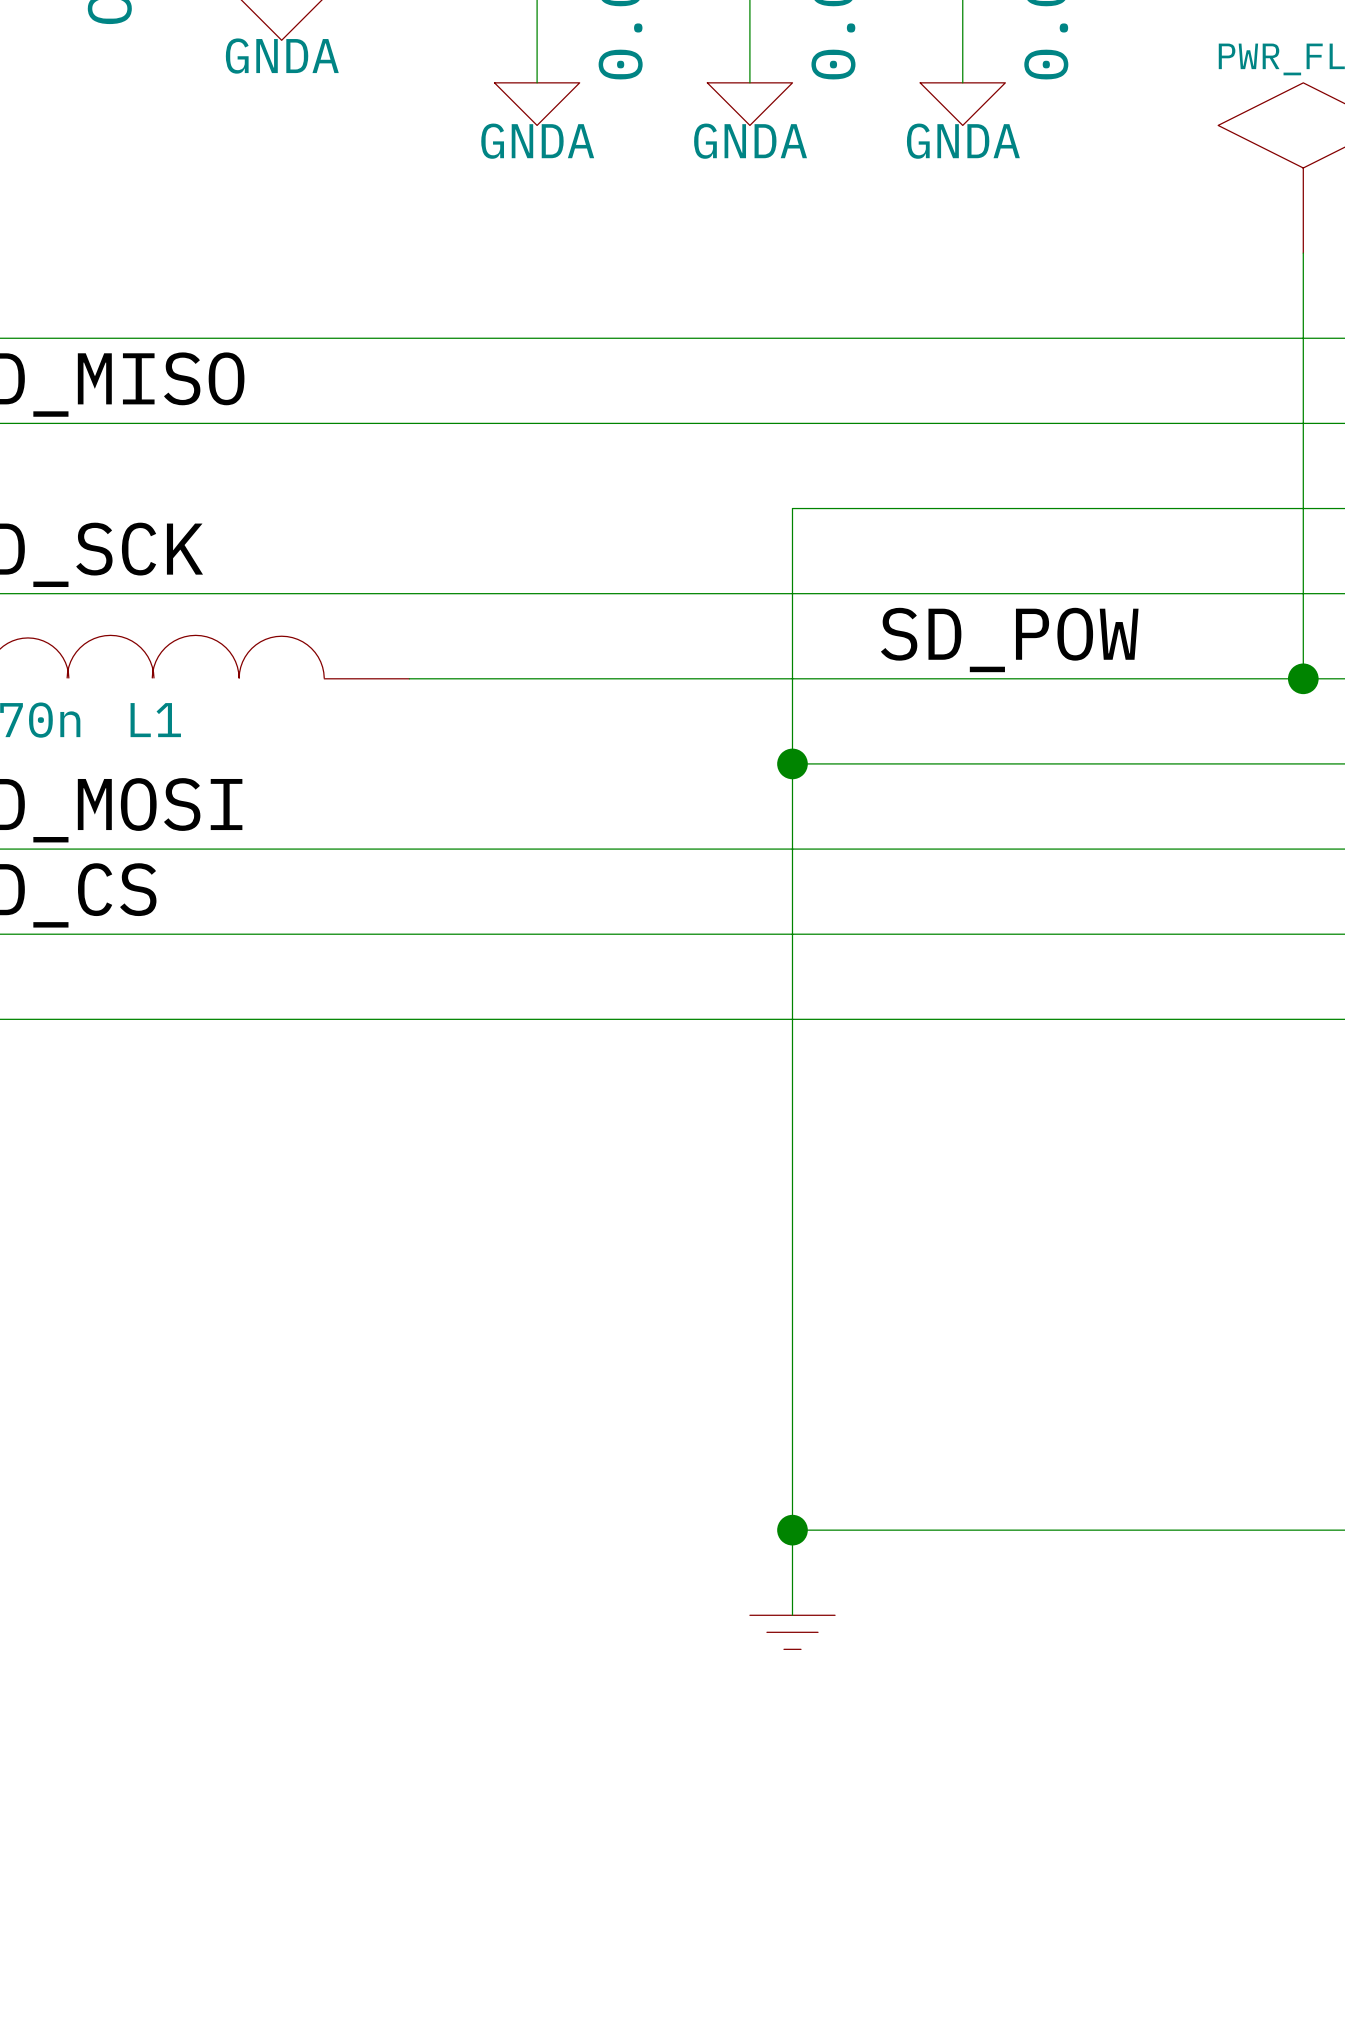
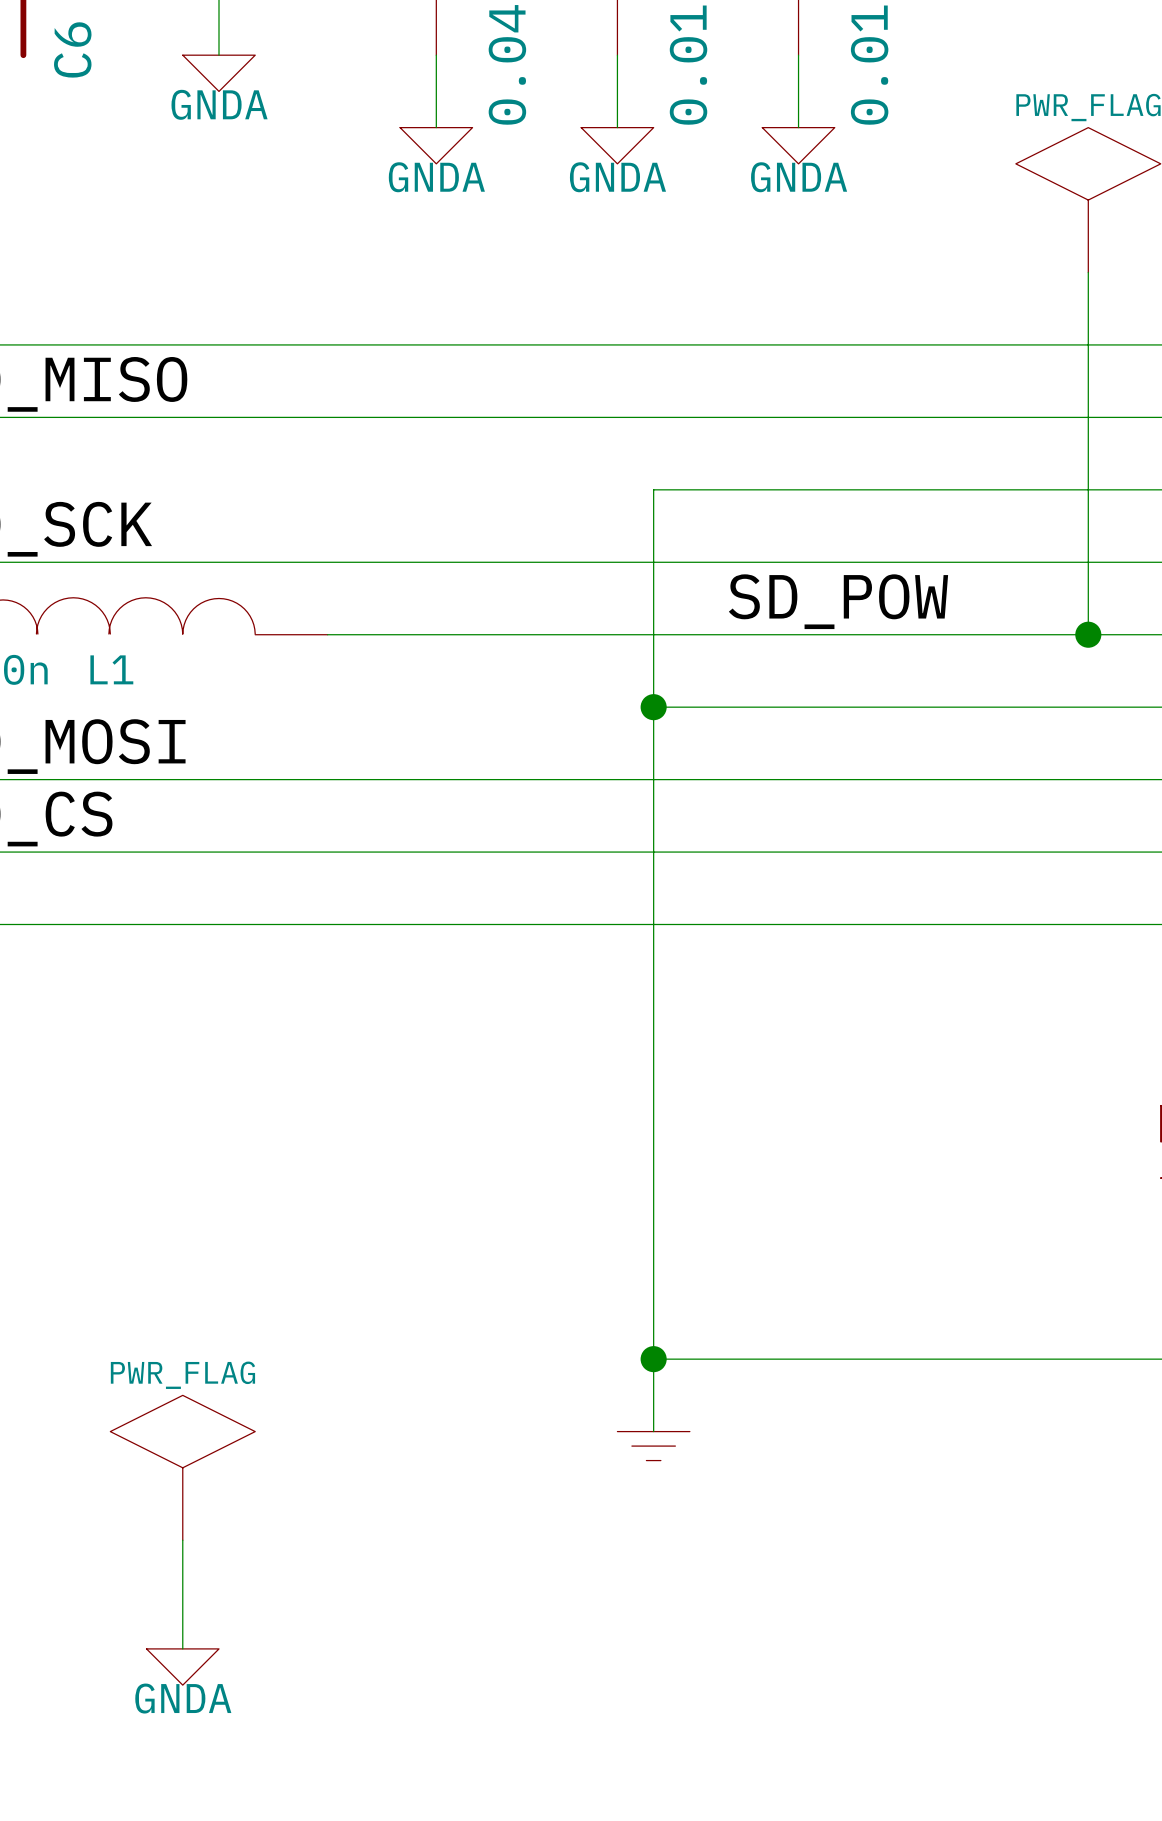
power symbol: none -> PWR_FLAG (182, 1467)
wire: none -> (182, 1540) (182, 1648)
power symbol: none -> GNDA (182, 1667)

